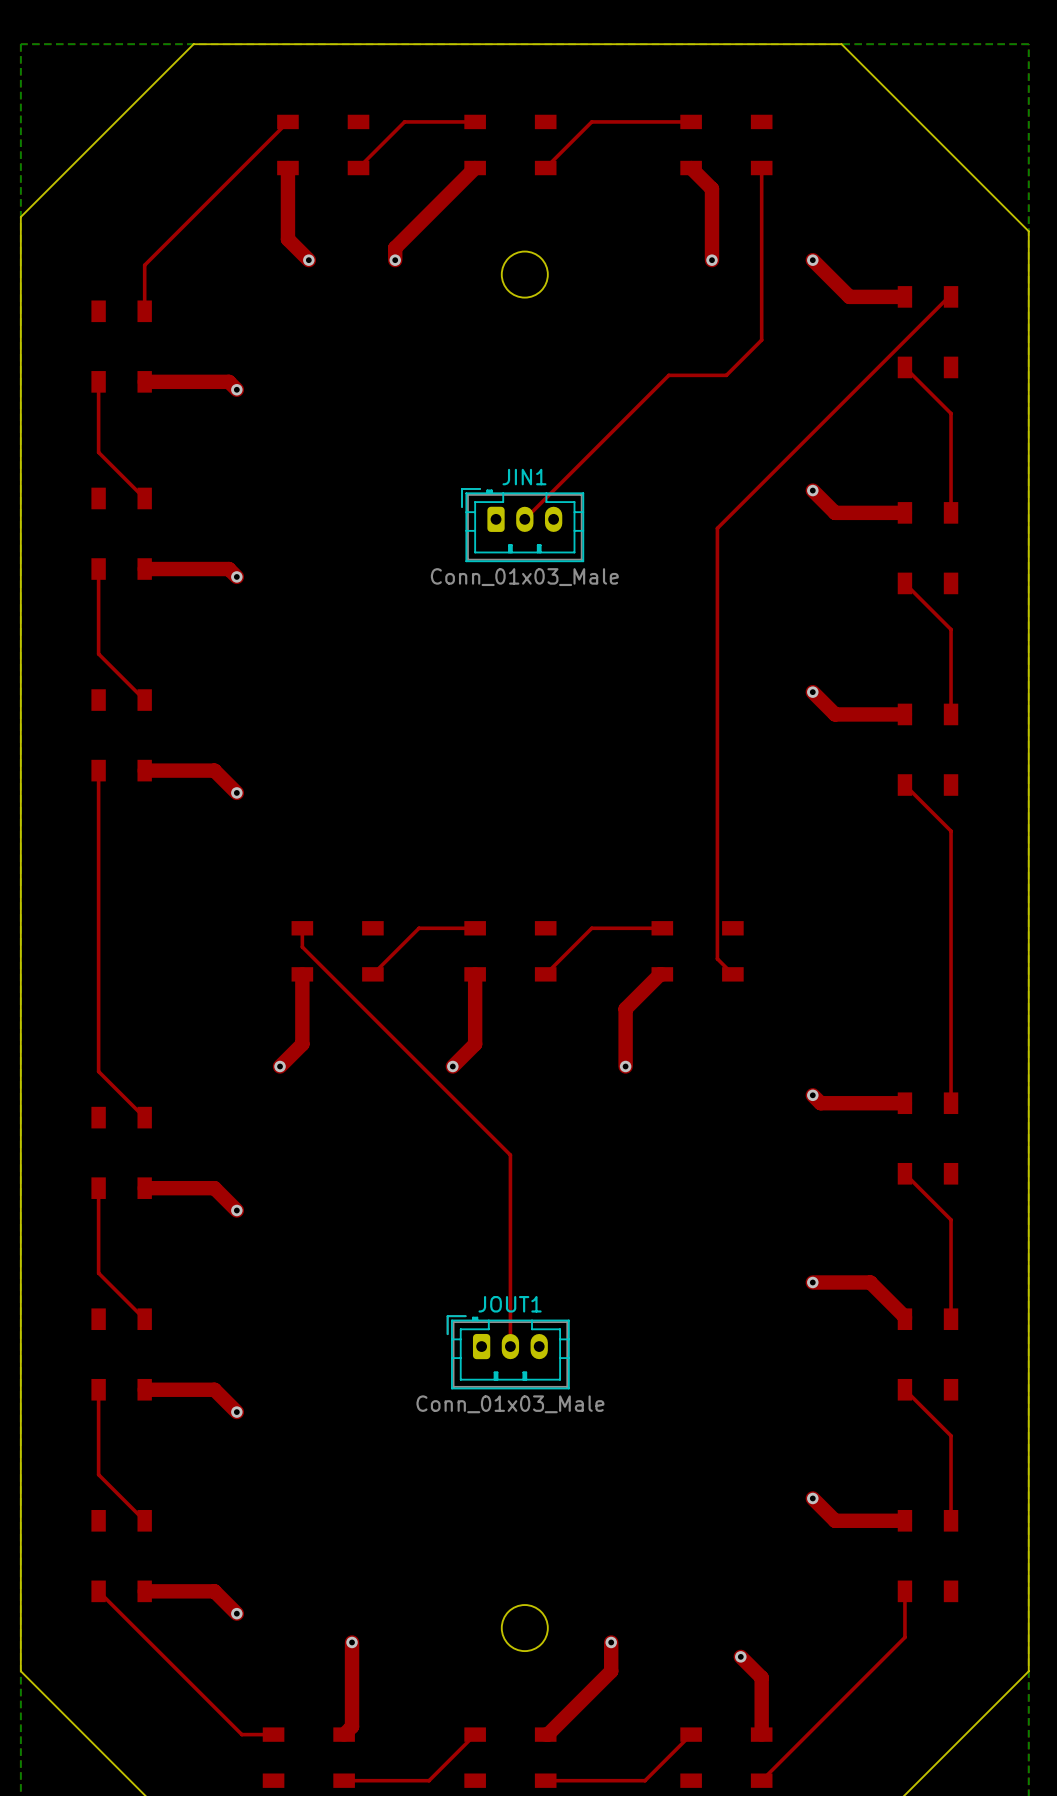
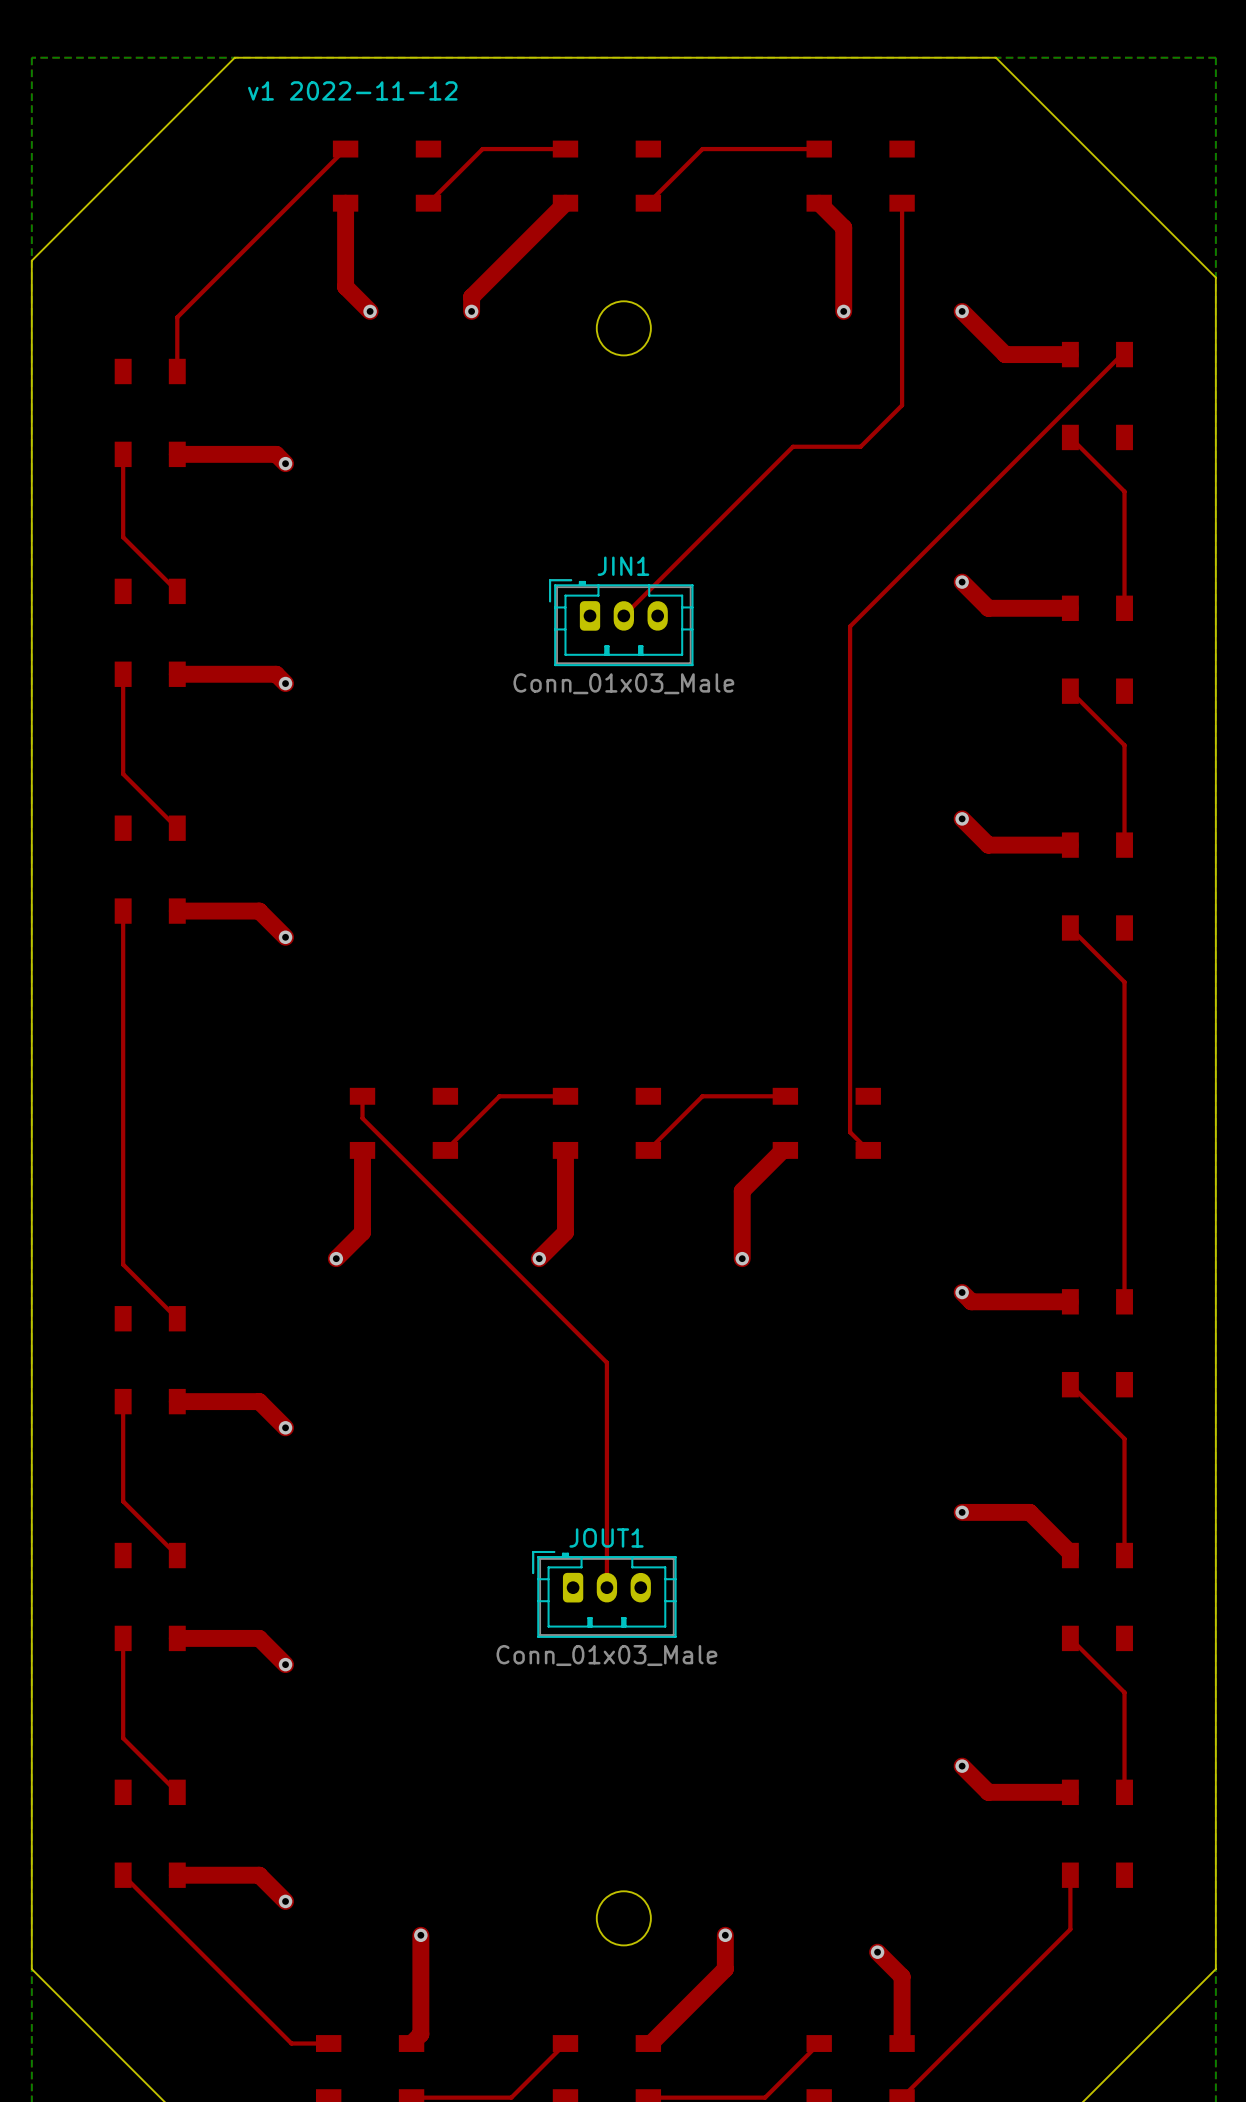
text: none -> v1 2022-11-12 (352, 90)

